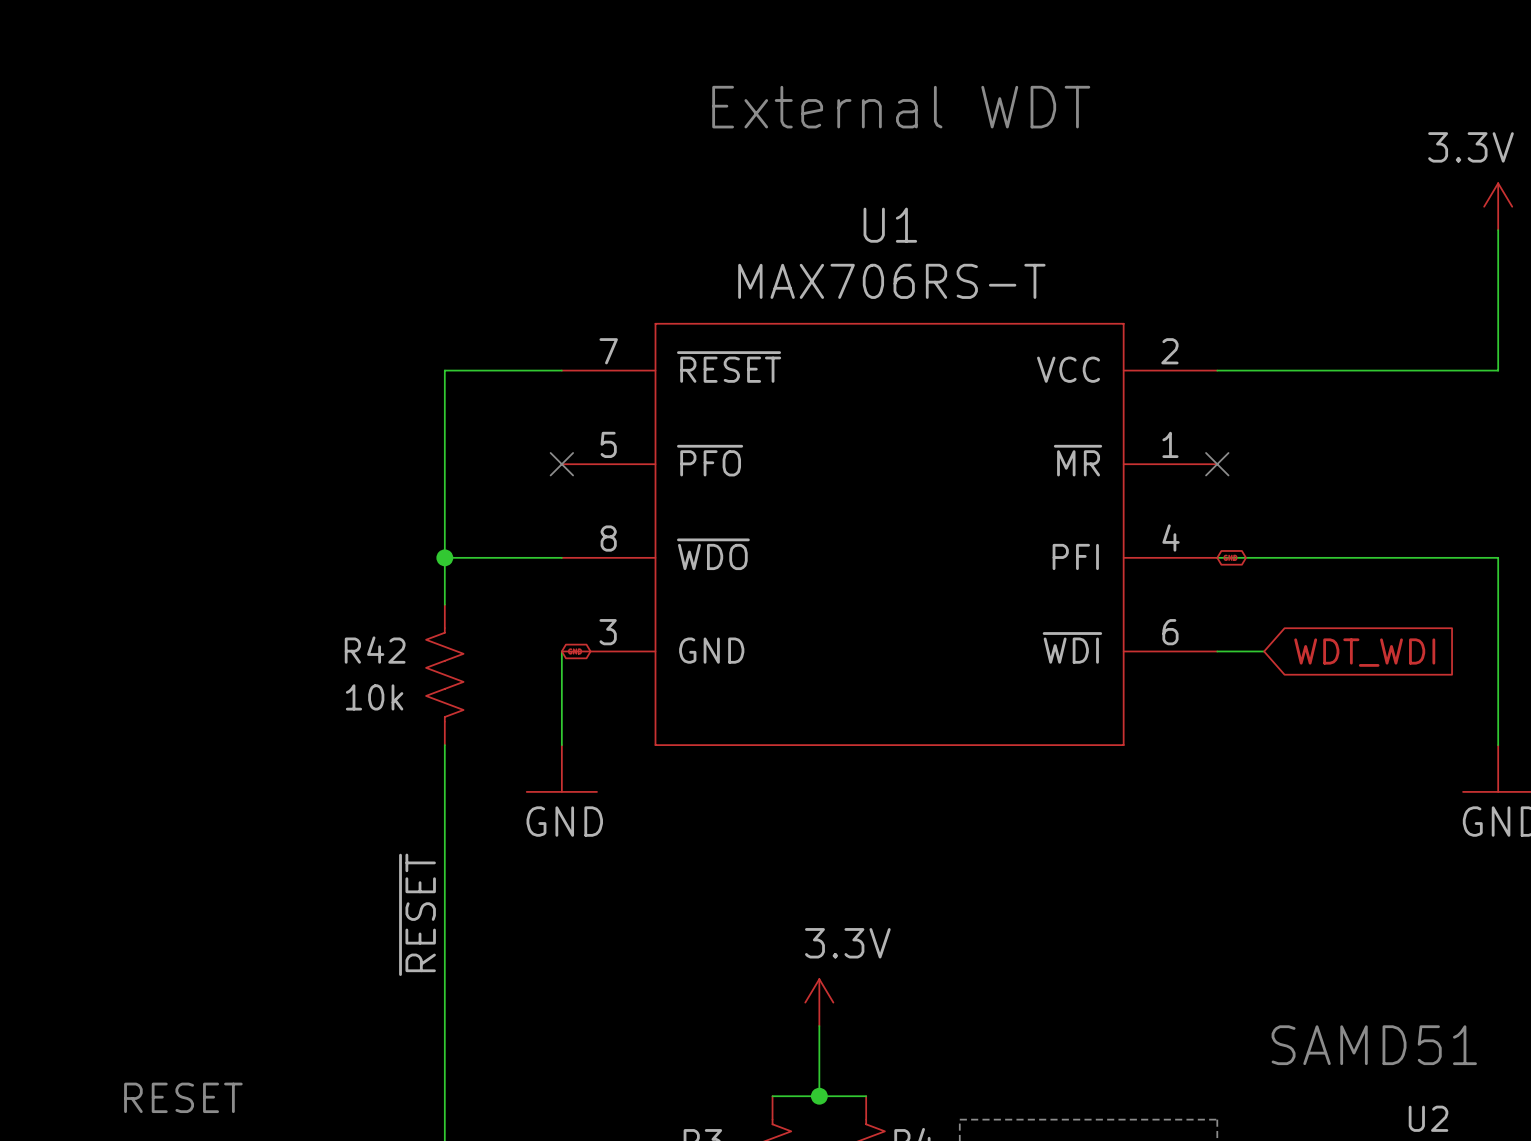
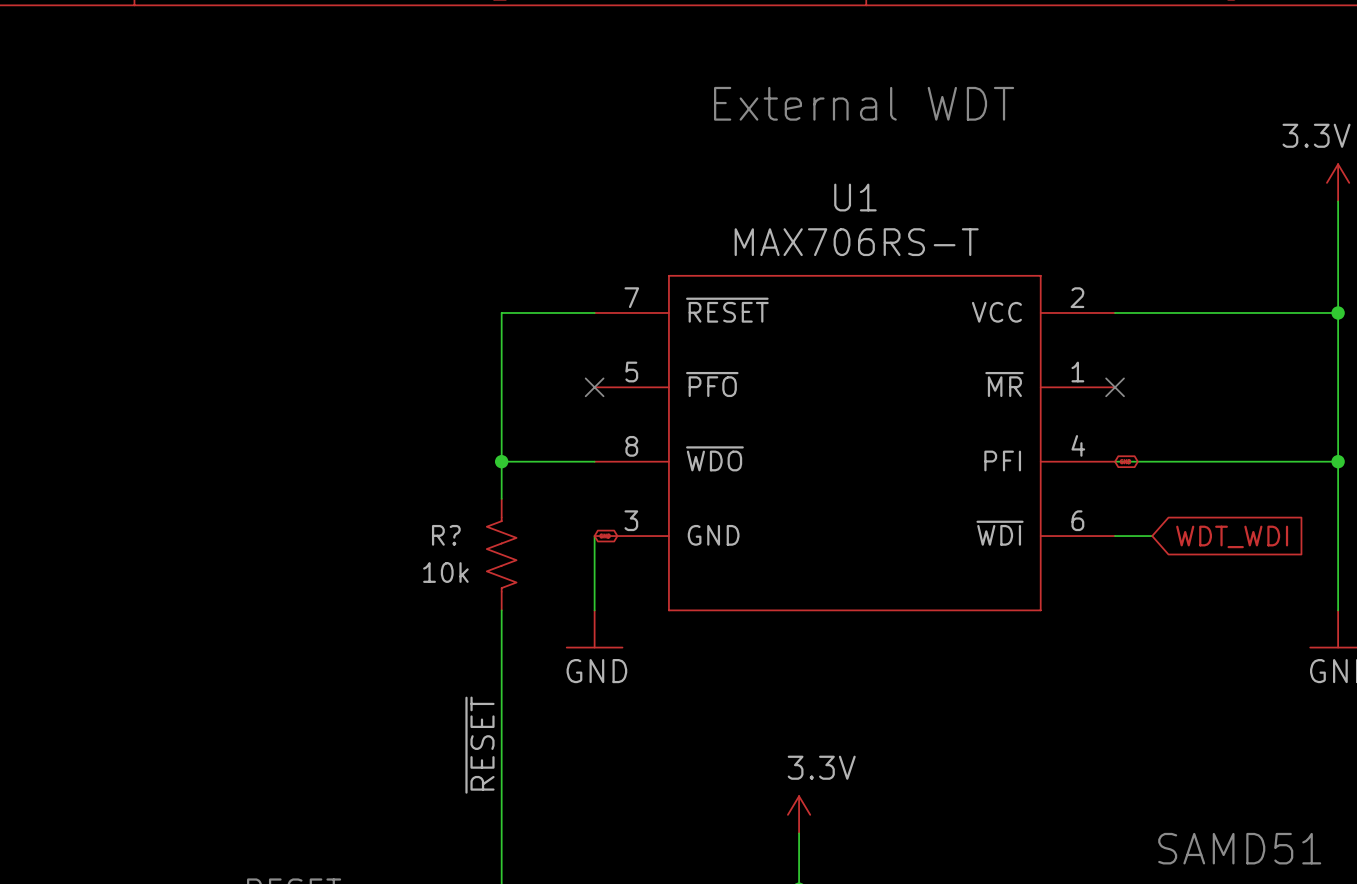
wire: none -> (1338, 312) (1338, 461)
junction: none -> (1338, 312)
junction: none -> (1338, 461)
R42 name: R42 (375, 650) -> R? (446, 535)

